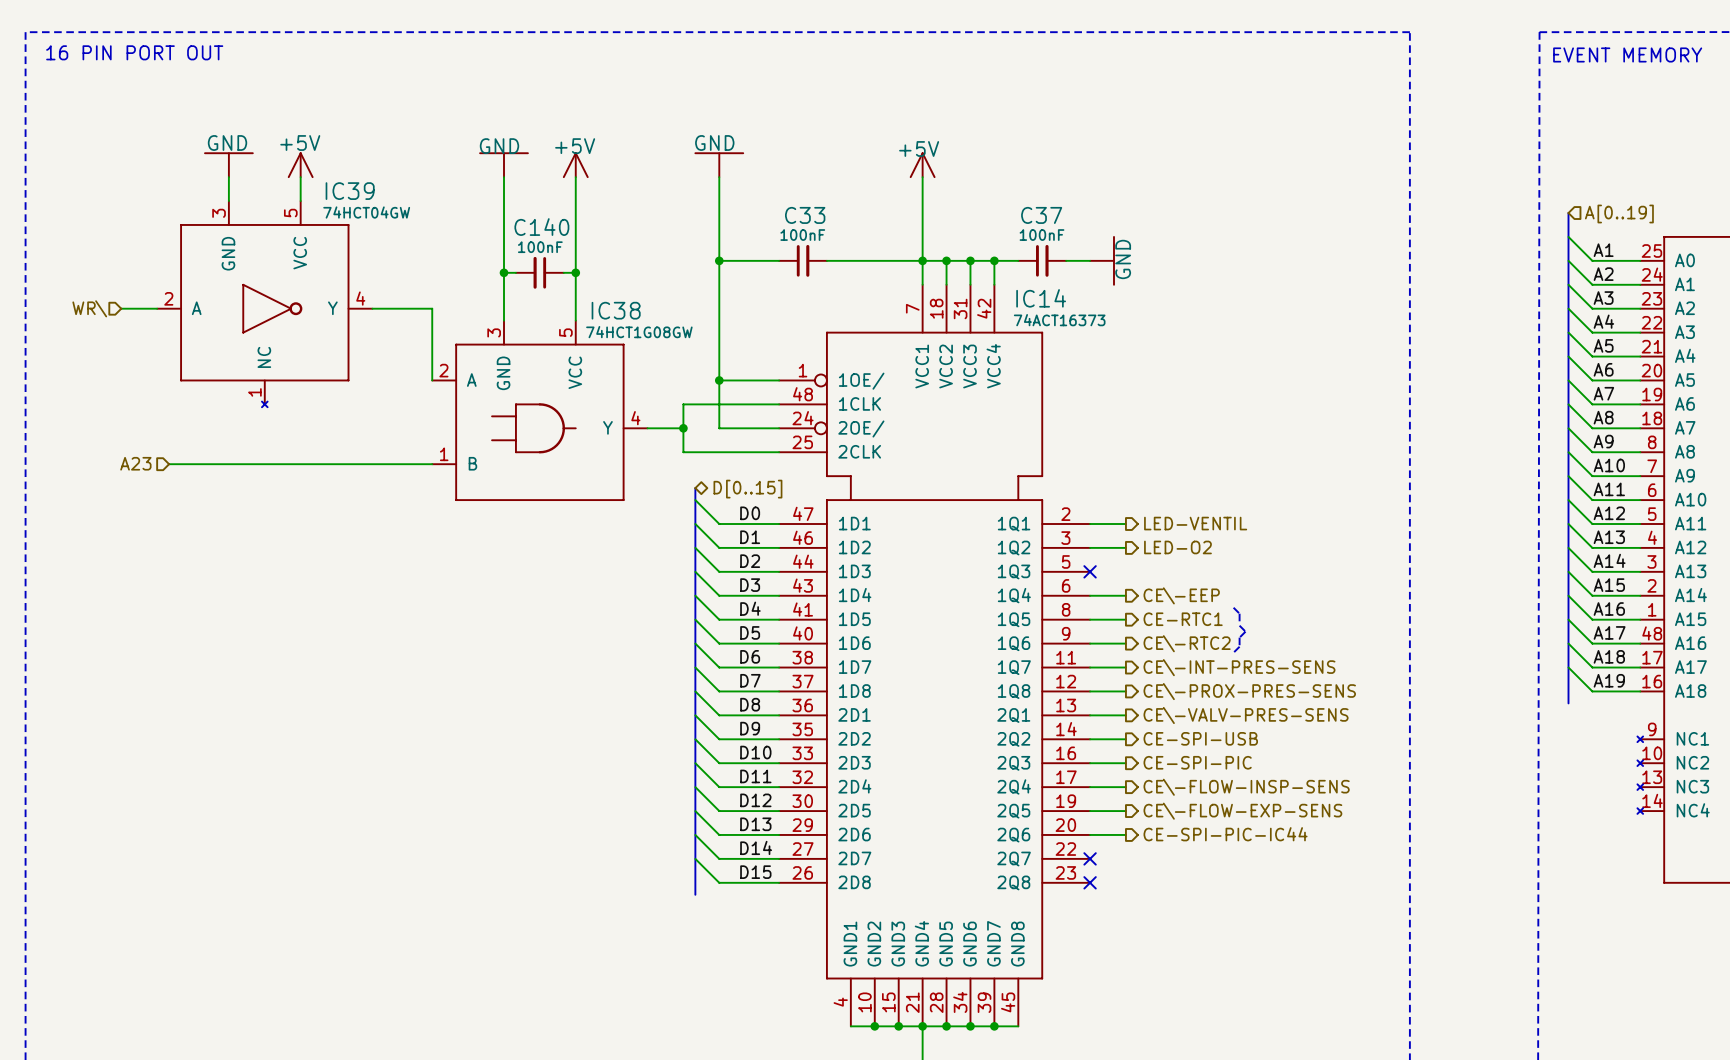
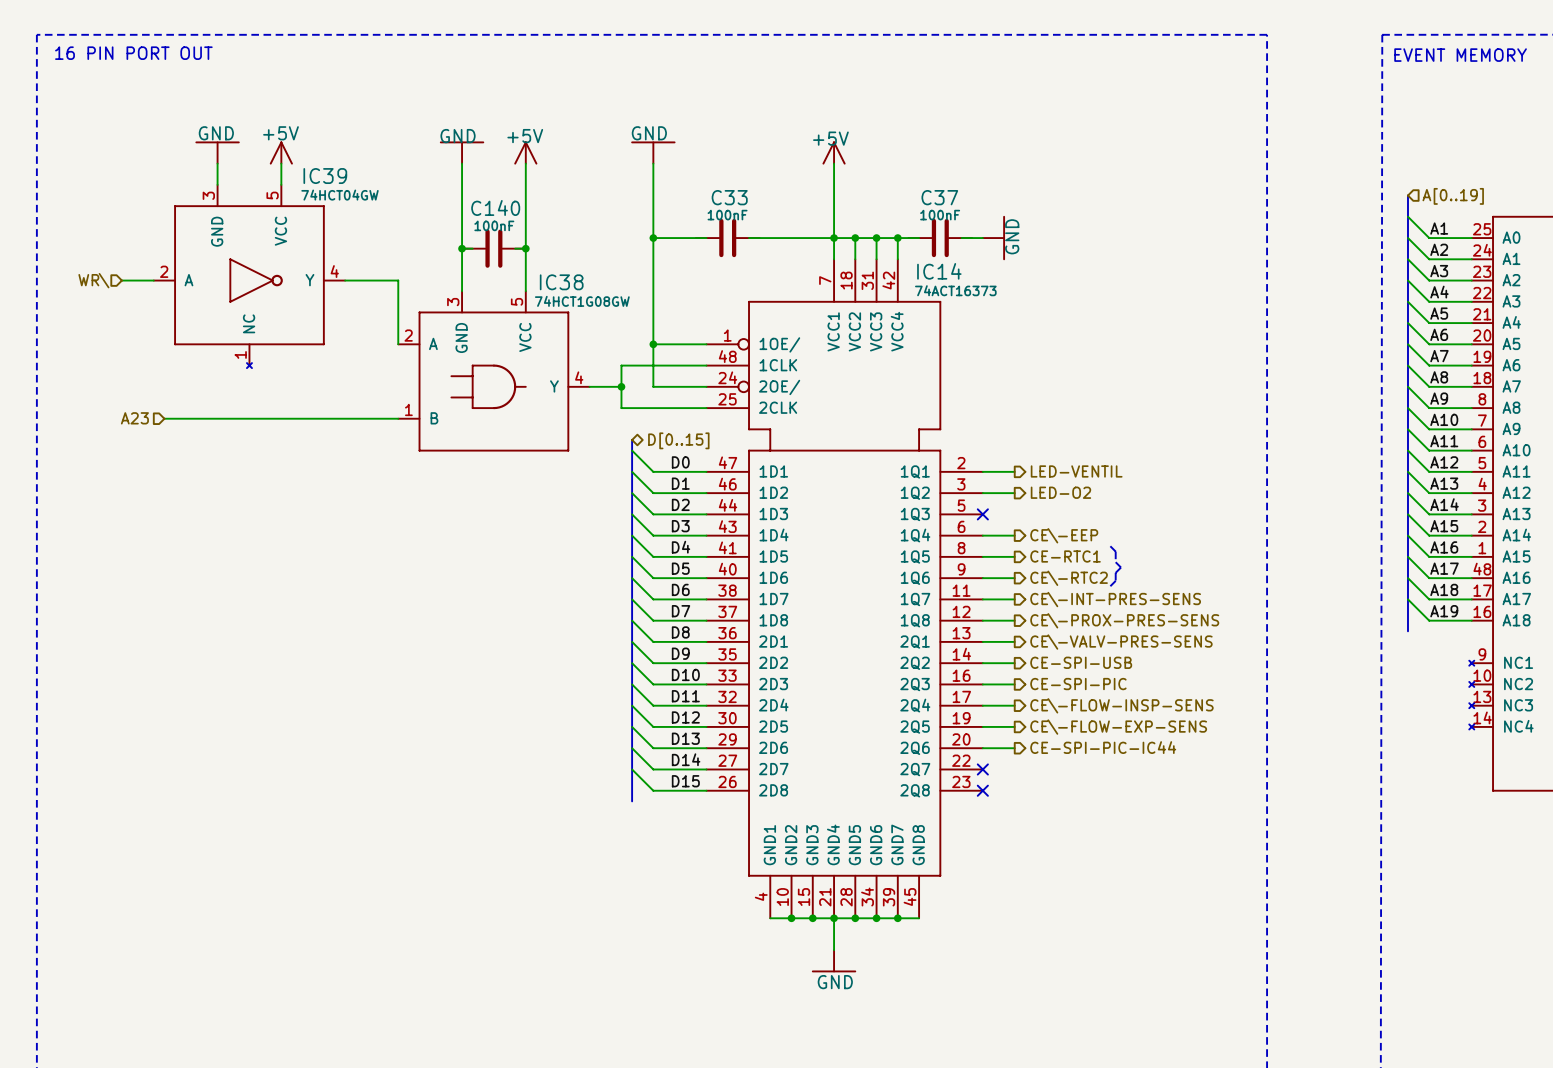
C33 symbol: [779, 244, 827, 277] -> [695, 218, 760, 258]
C37 symbol: [1018, 244, 1067, 277] -> [908, 218, 973, 258]
C140 symbol: [515, 256, 564, 289] -> [462, 229, 526, 268]

